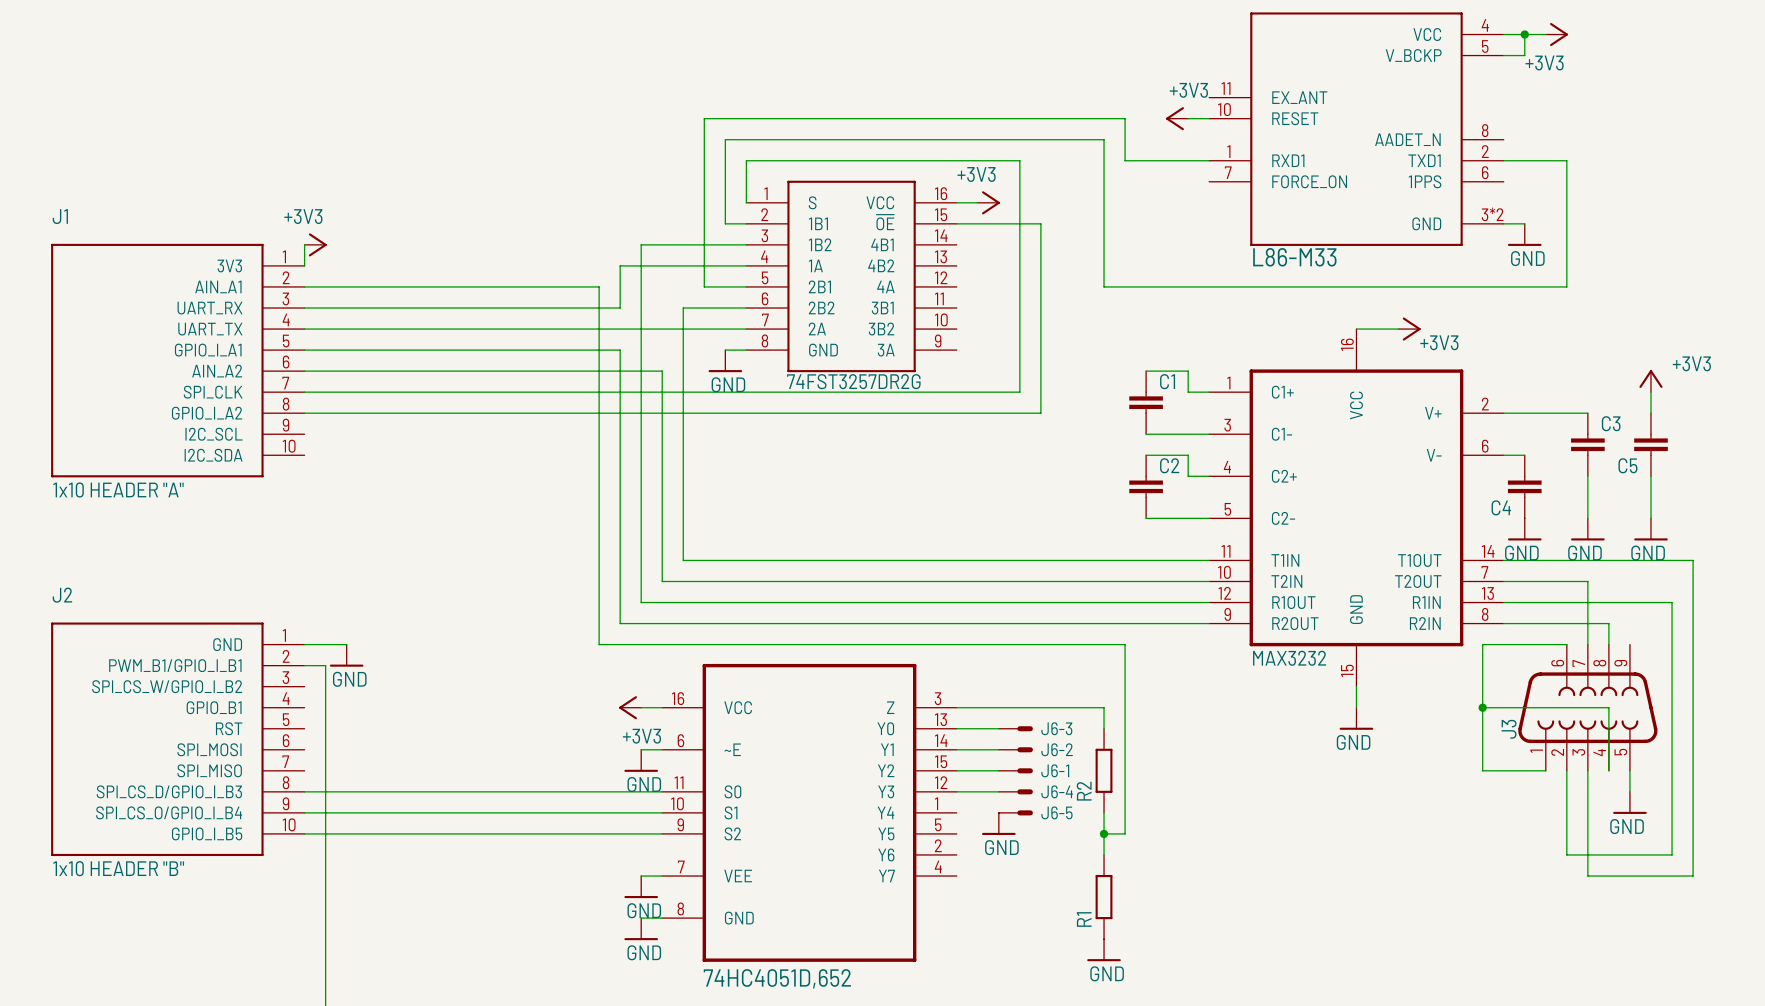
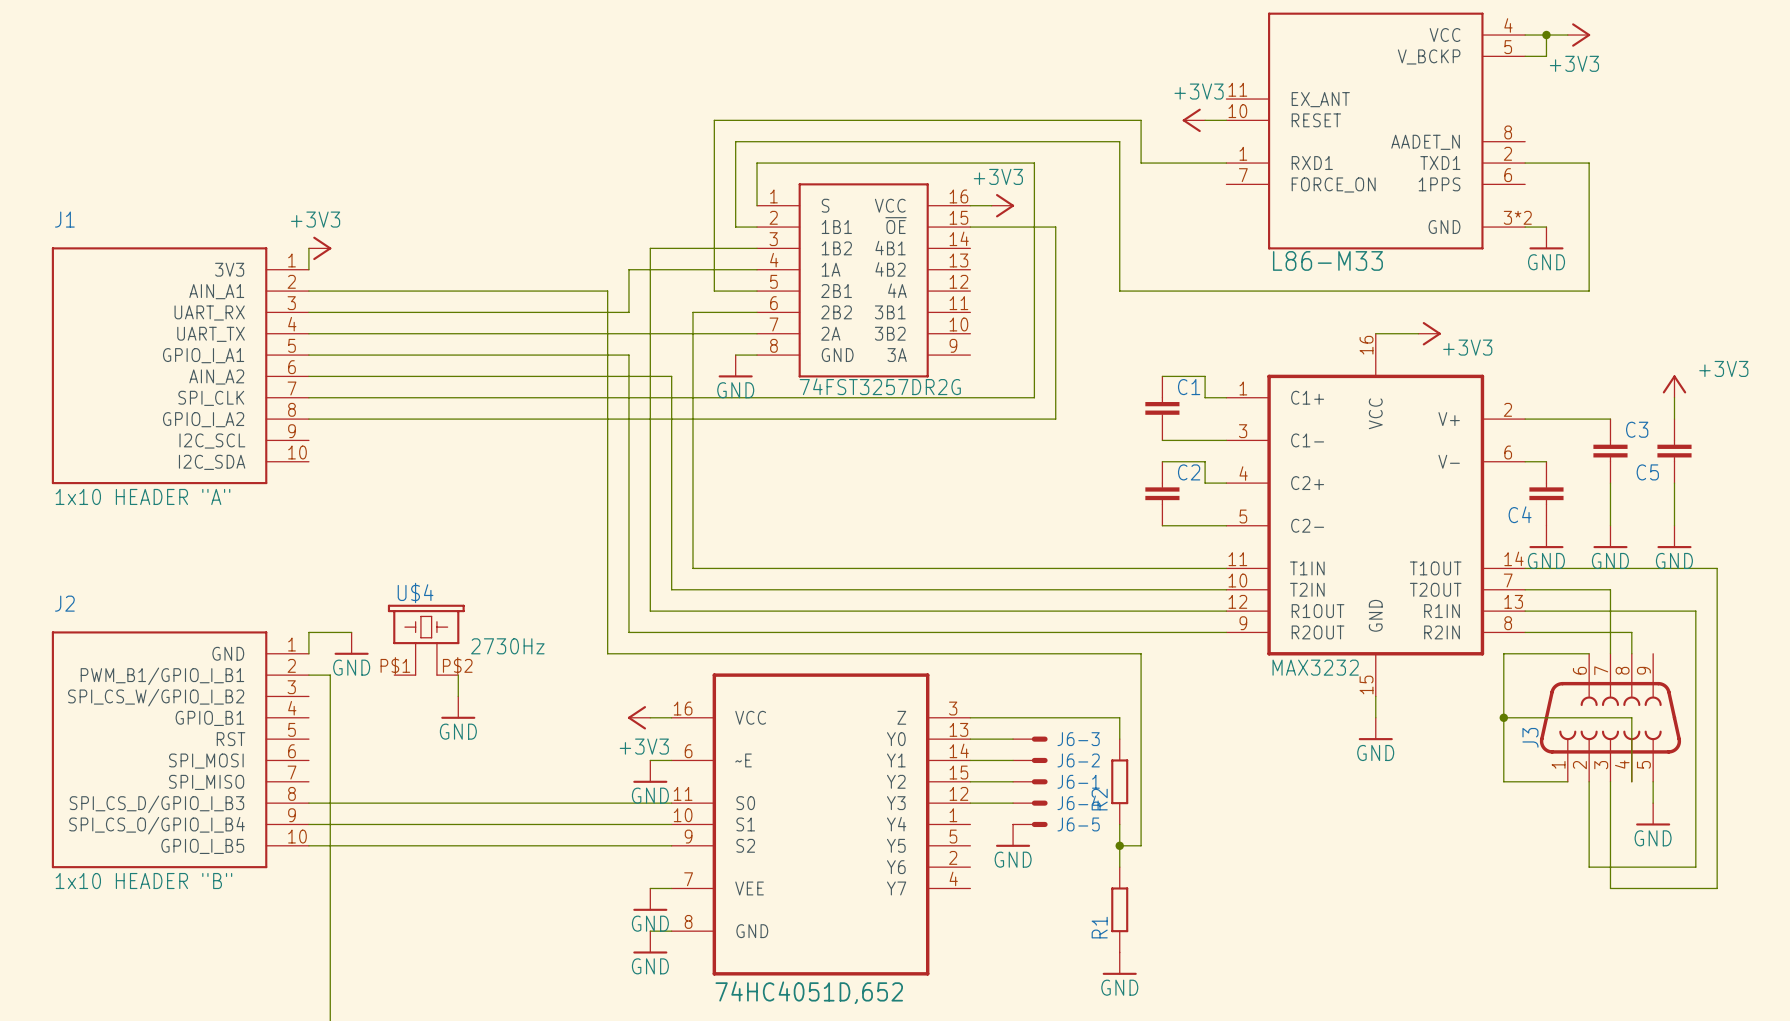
U$4: none -> (426, 640)
wire: (304, 644) (346, 644) -> (308, 653) (308, 632) (351, 632)
power symbol position: GND (346, 655) -> GND (351, 643)
wire: none -> (458, 675) (458, 696)
power symbol: none -> GND (458, 707)

